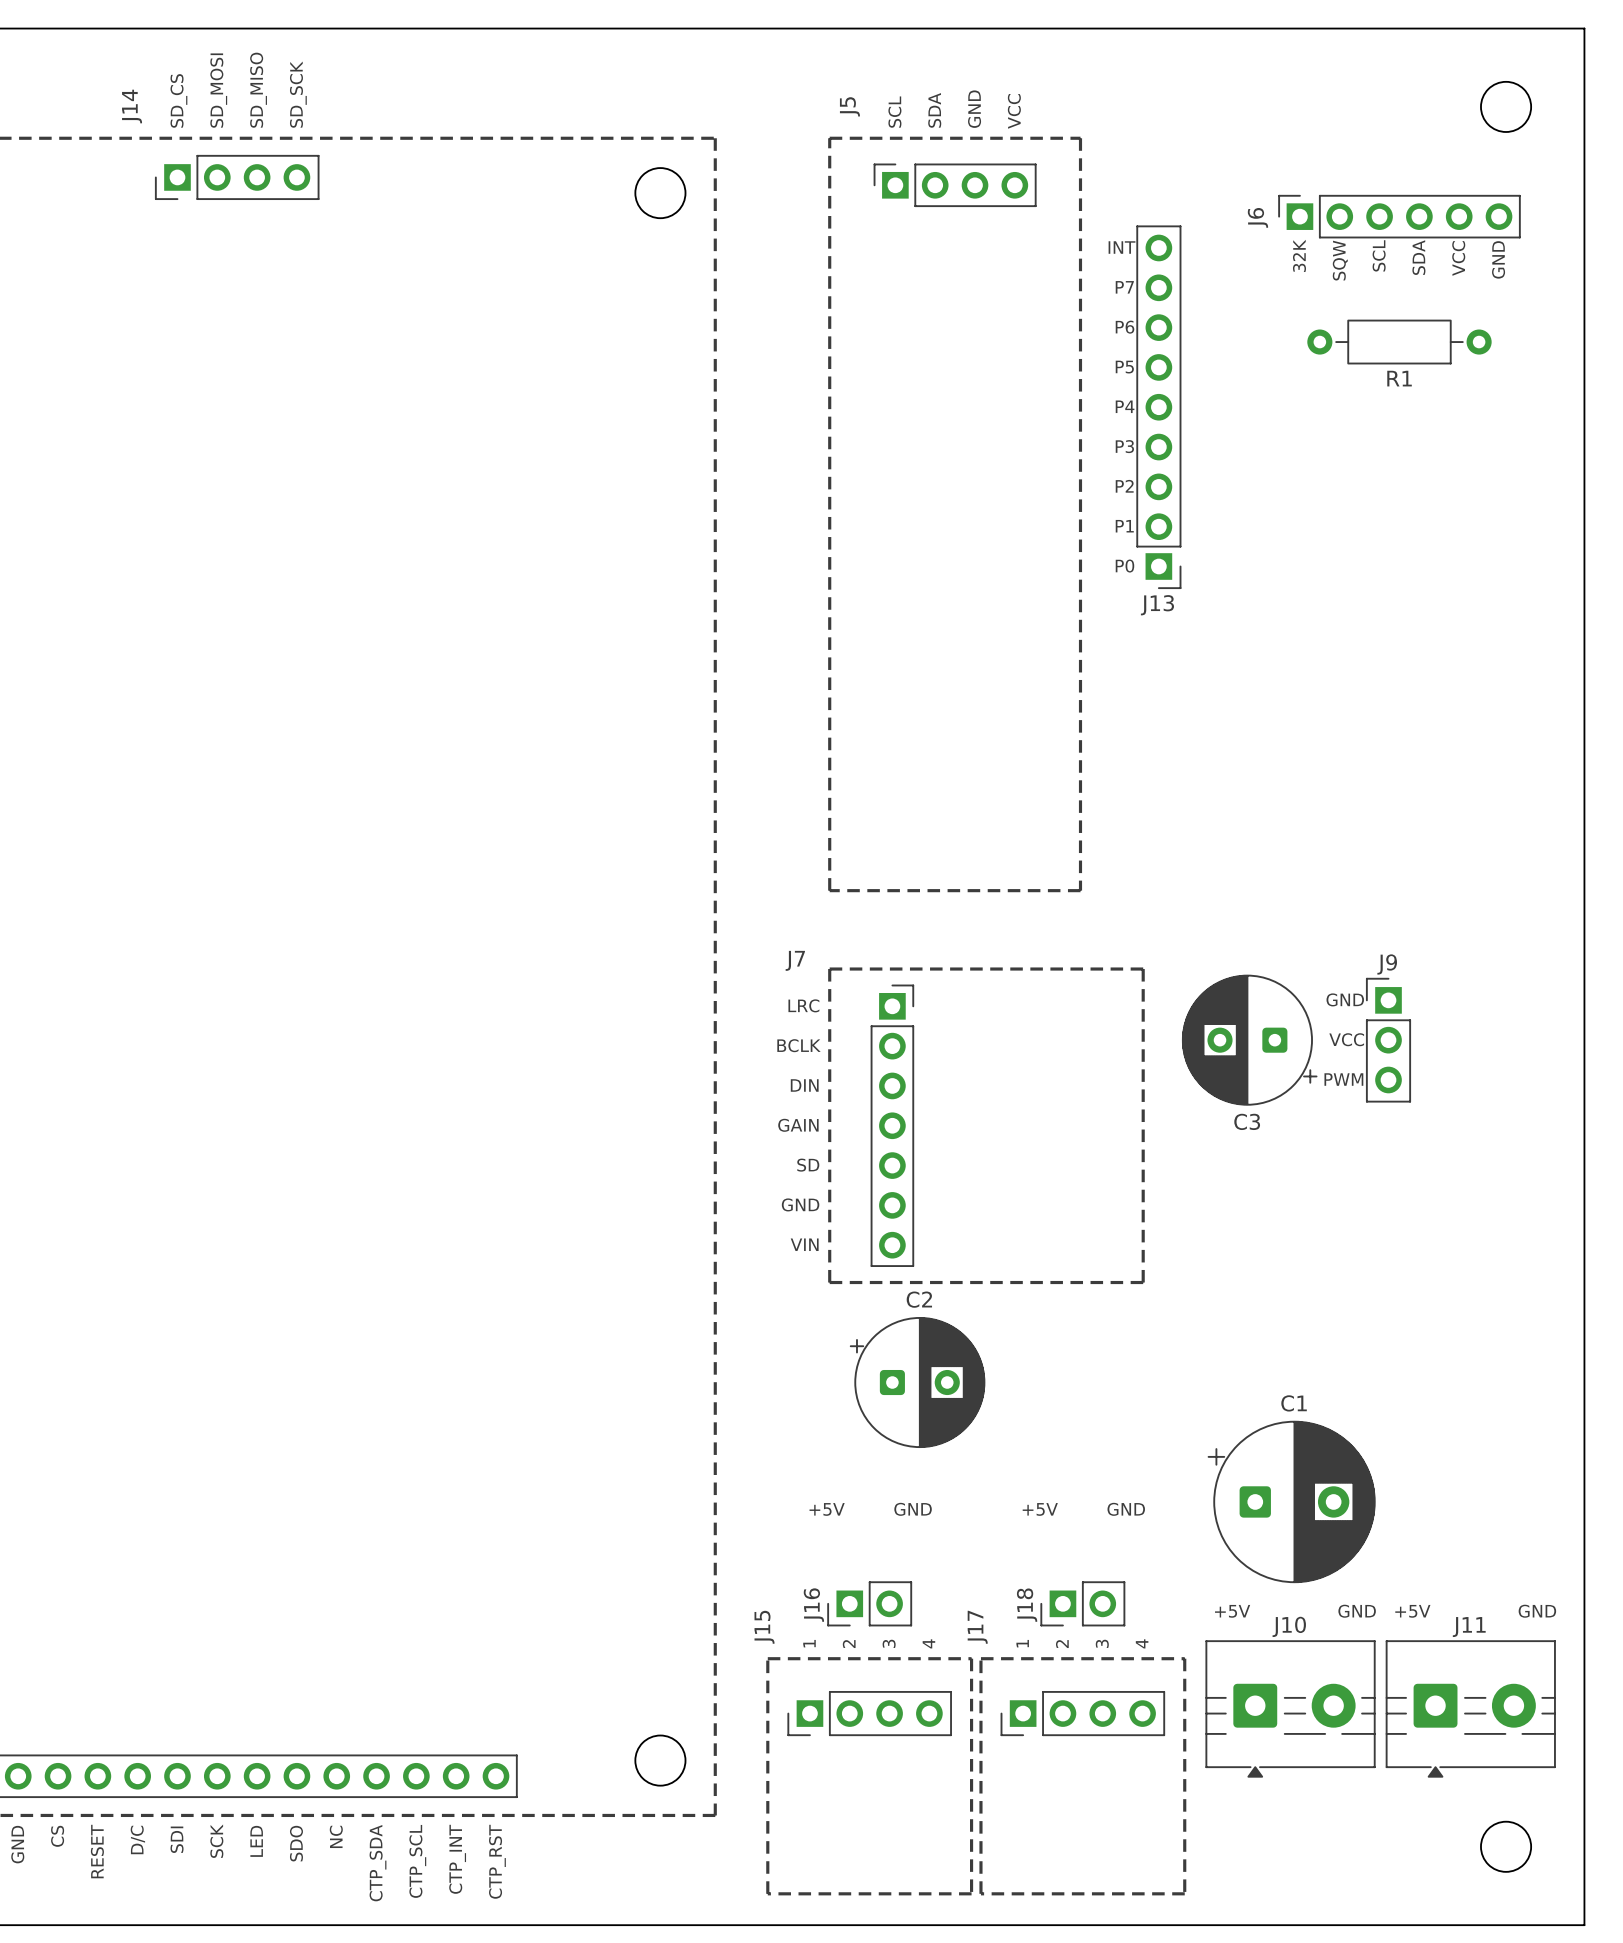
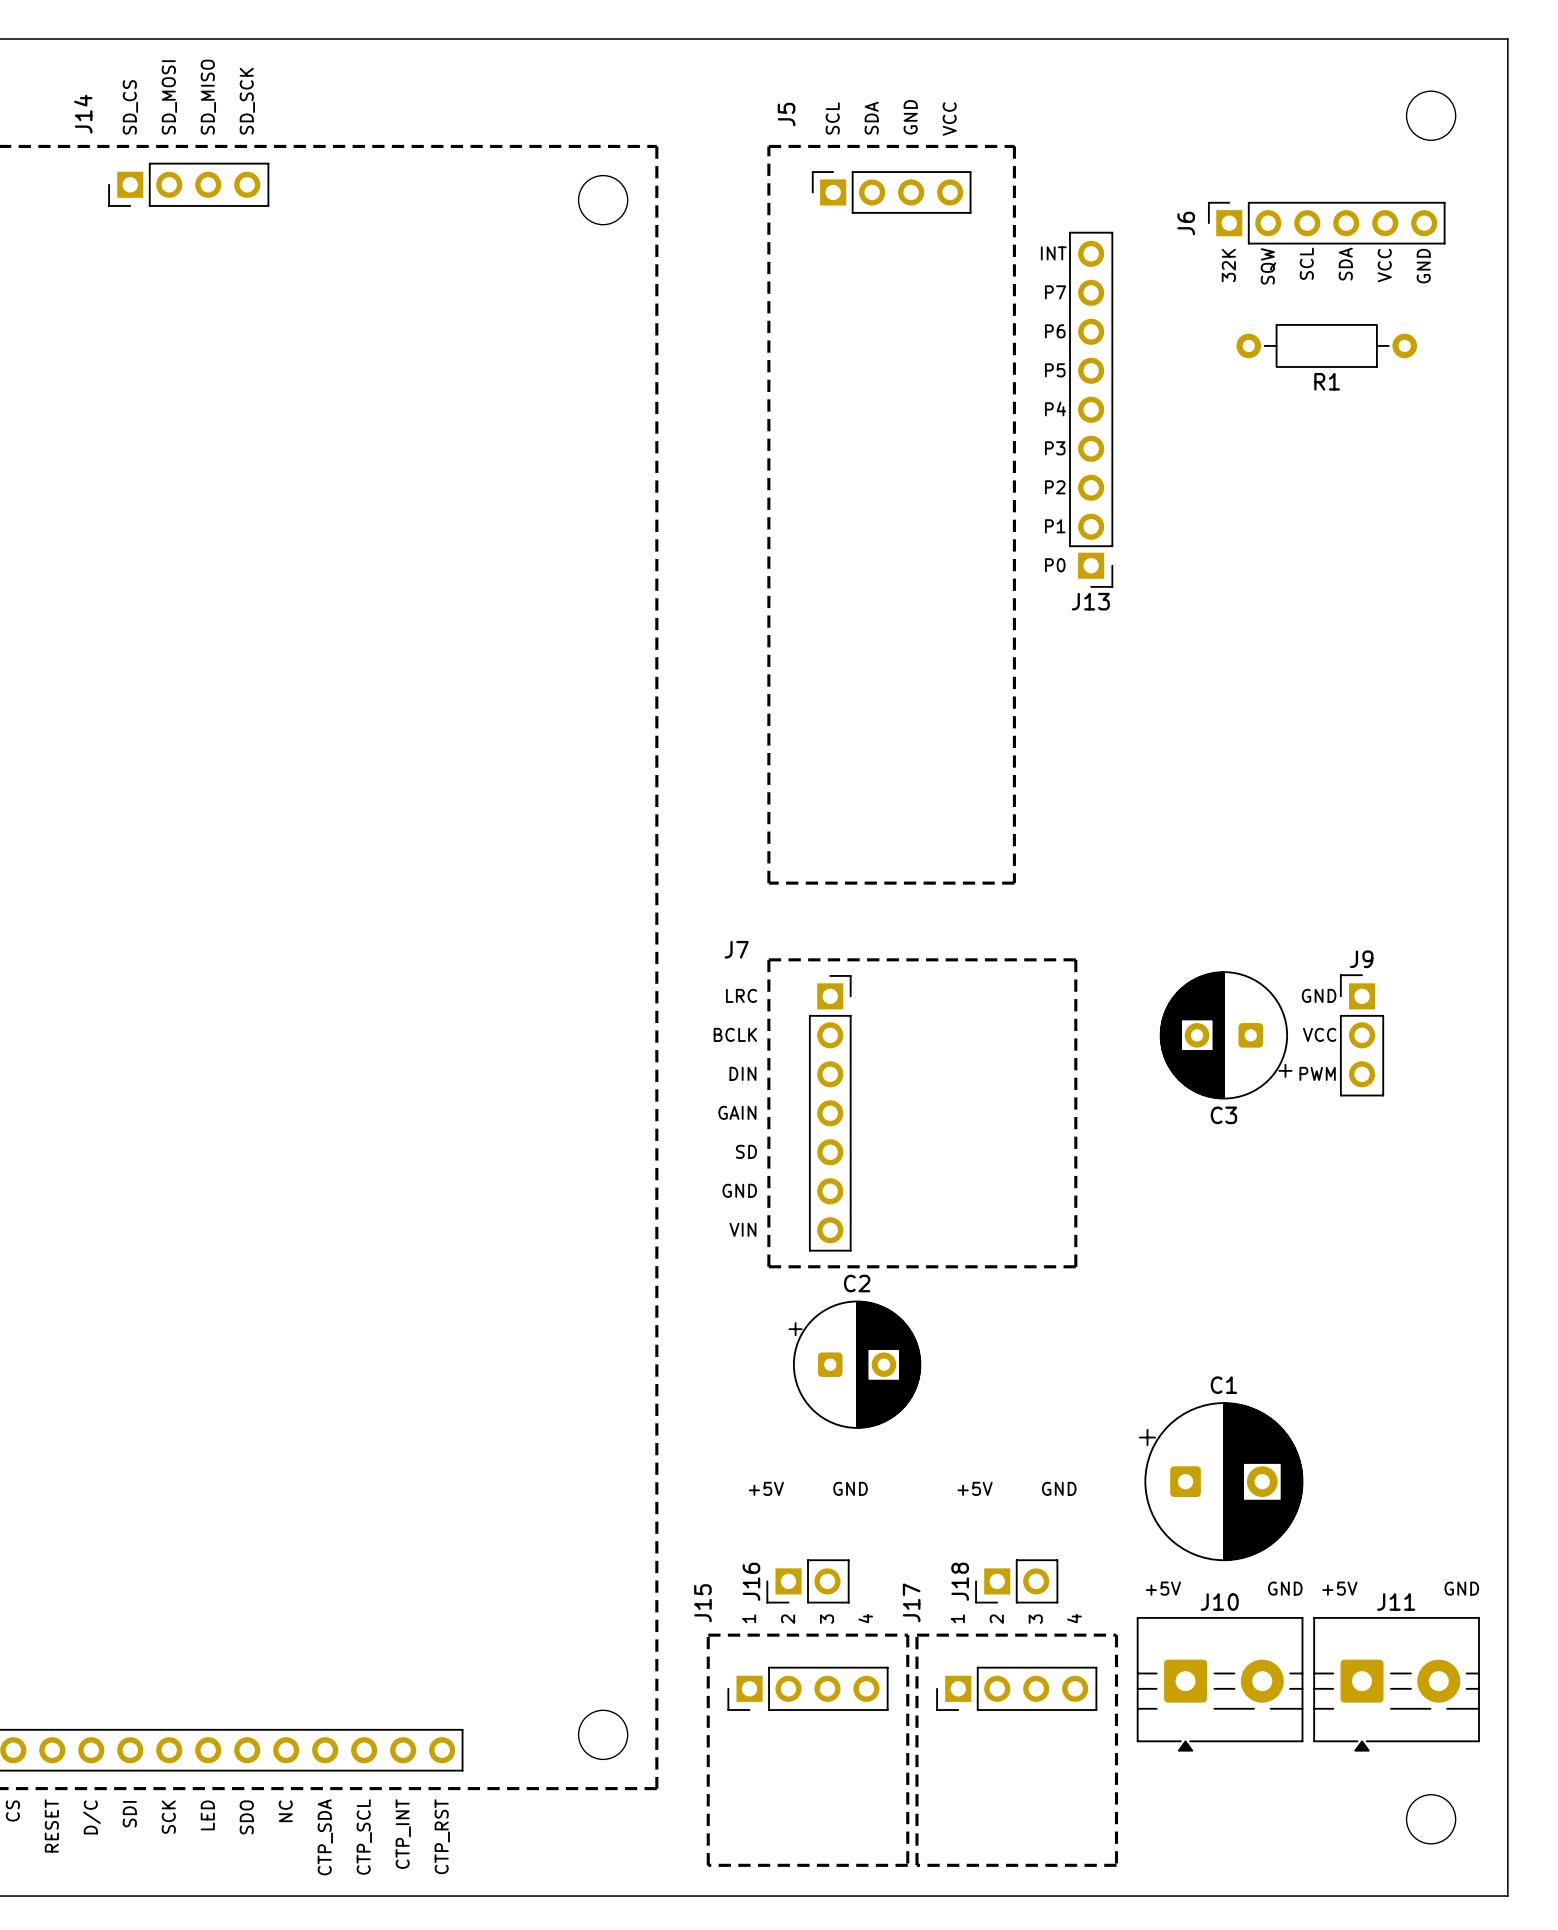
text position: GND (1345, 999) -> GND (1319, 995)
text position: VCC (1346, 1039) -> VCC (1319, 1034)
C3 position: (1249, 1040) -> (1226, 1035)
J9 position: (1388, 1040) -> (1362, 1035)
text position: PWM (1343, 1079) -> PWM (1317, 1073)

